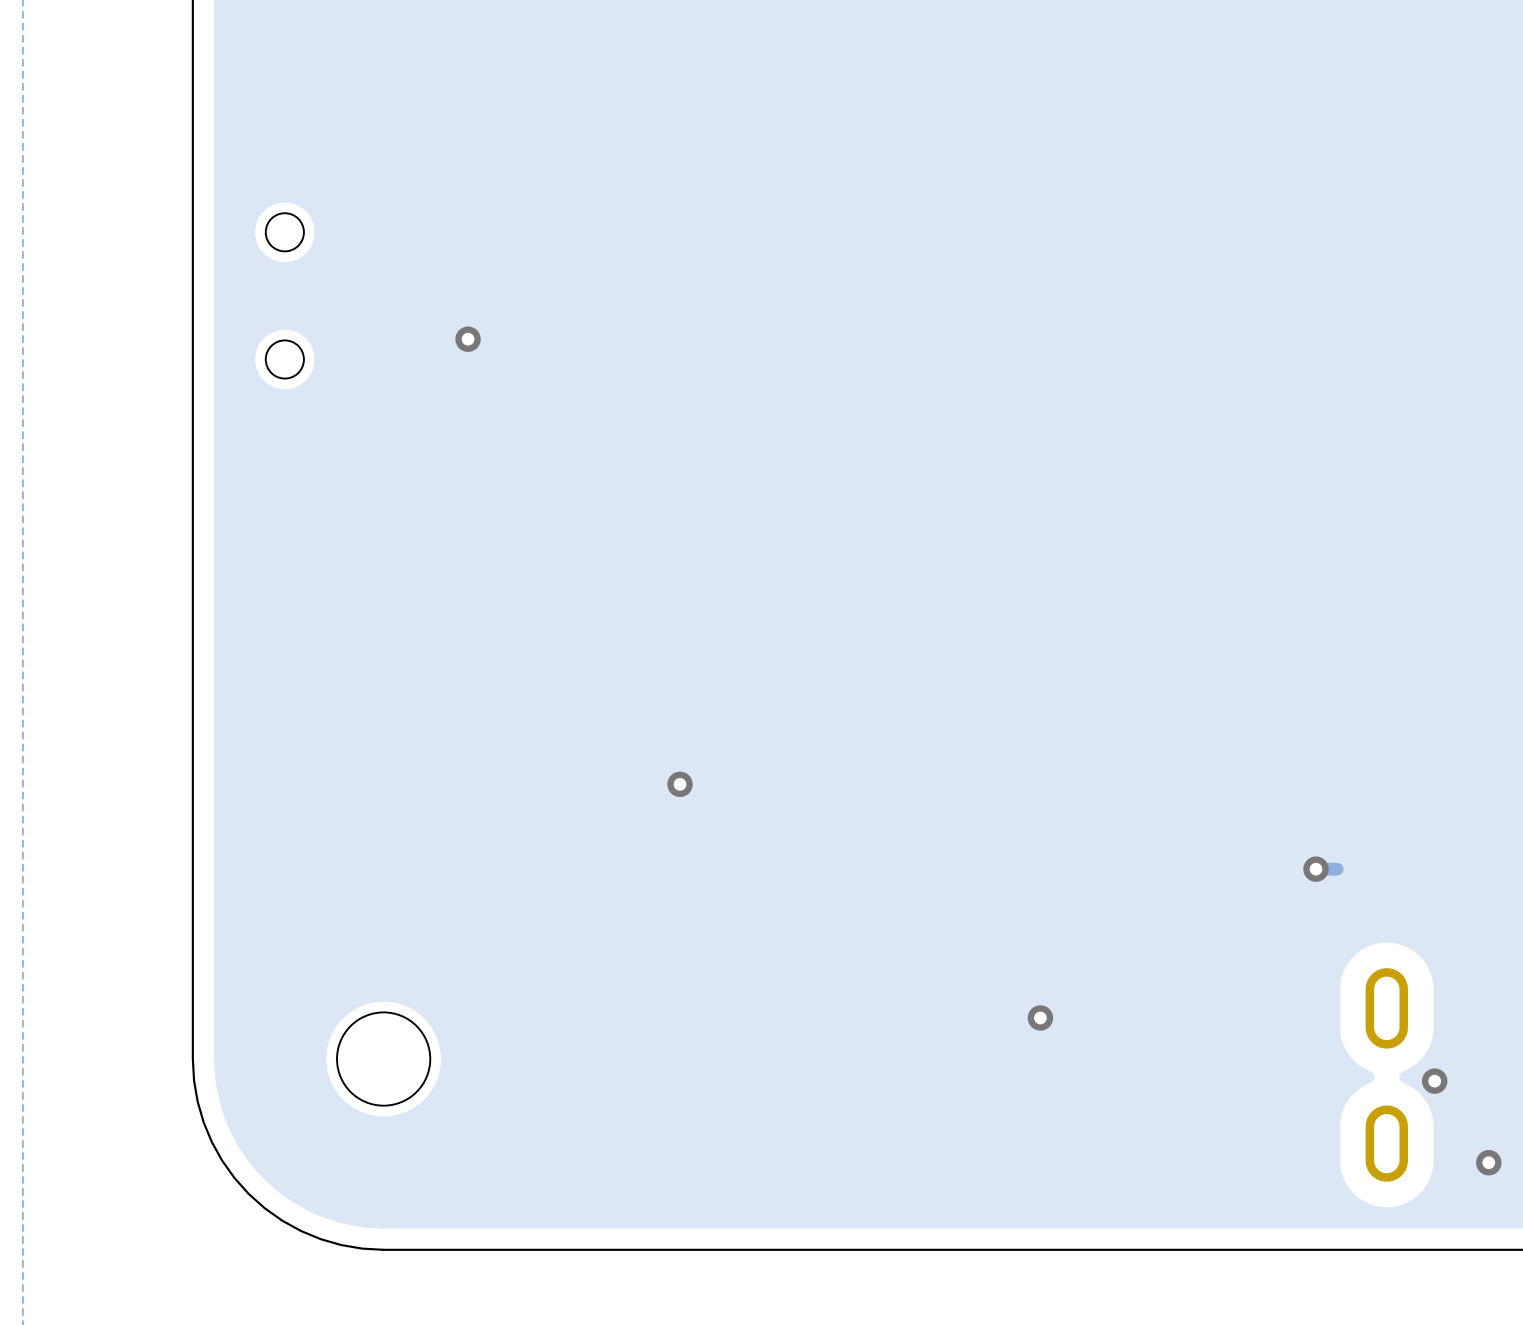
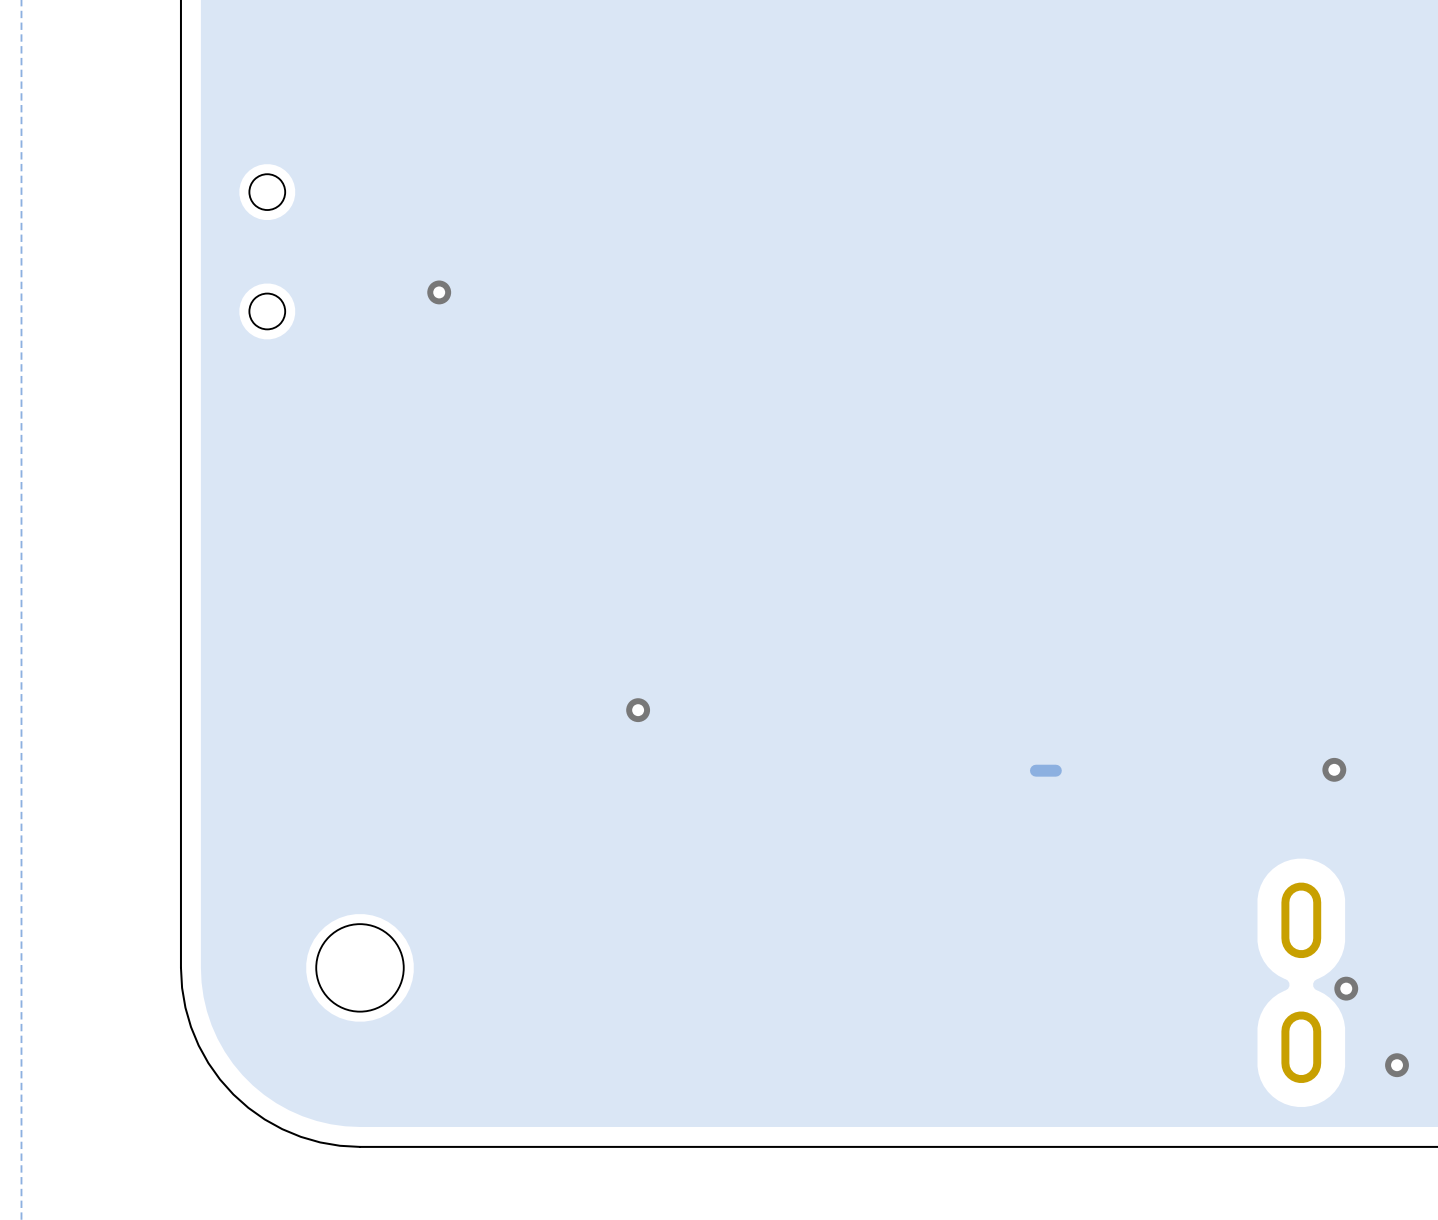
via position: (1315, 869) -> (1334, 769)
track: (1337, 869) (1315, 869) -> (1055, 770) (1035, 770)
via: (1040, 1017) -> none

